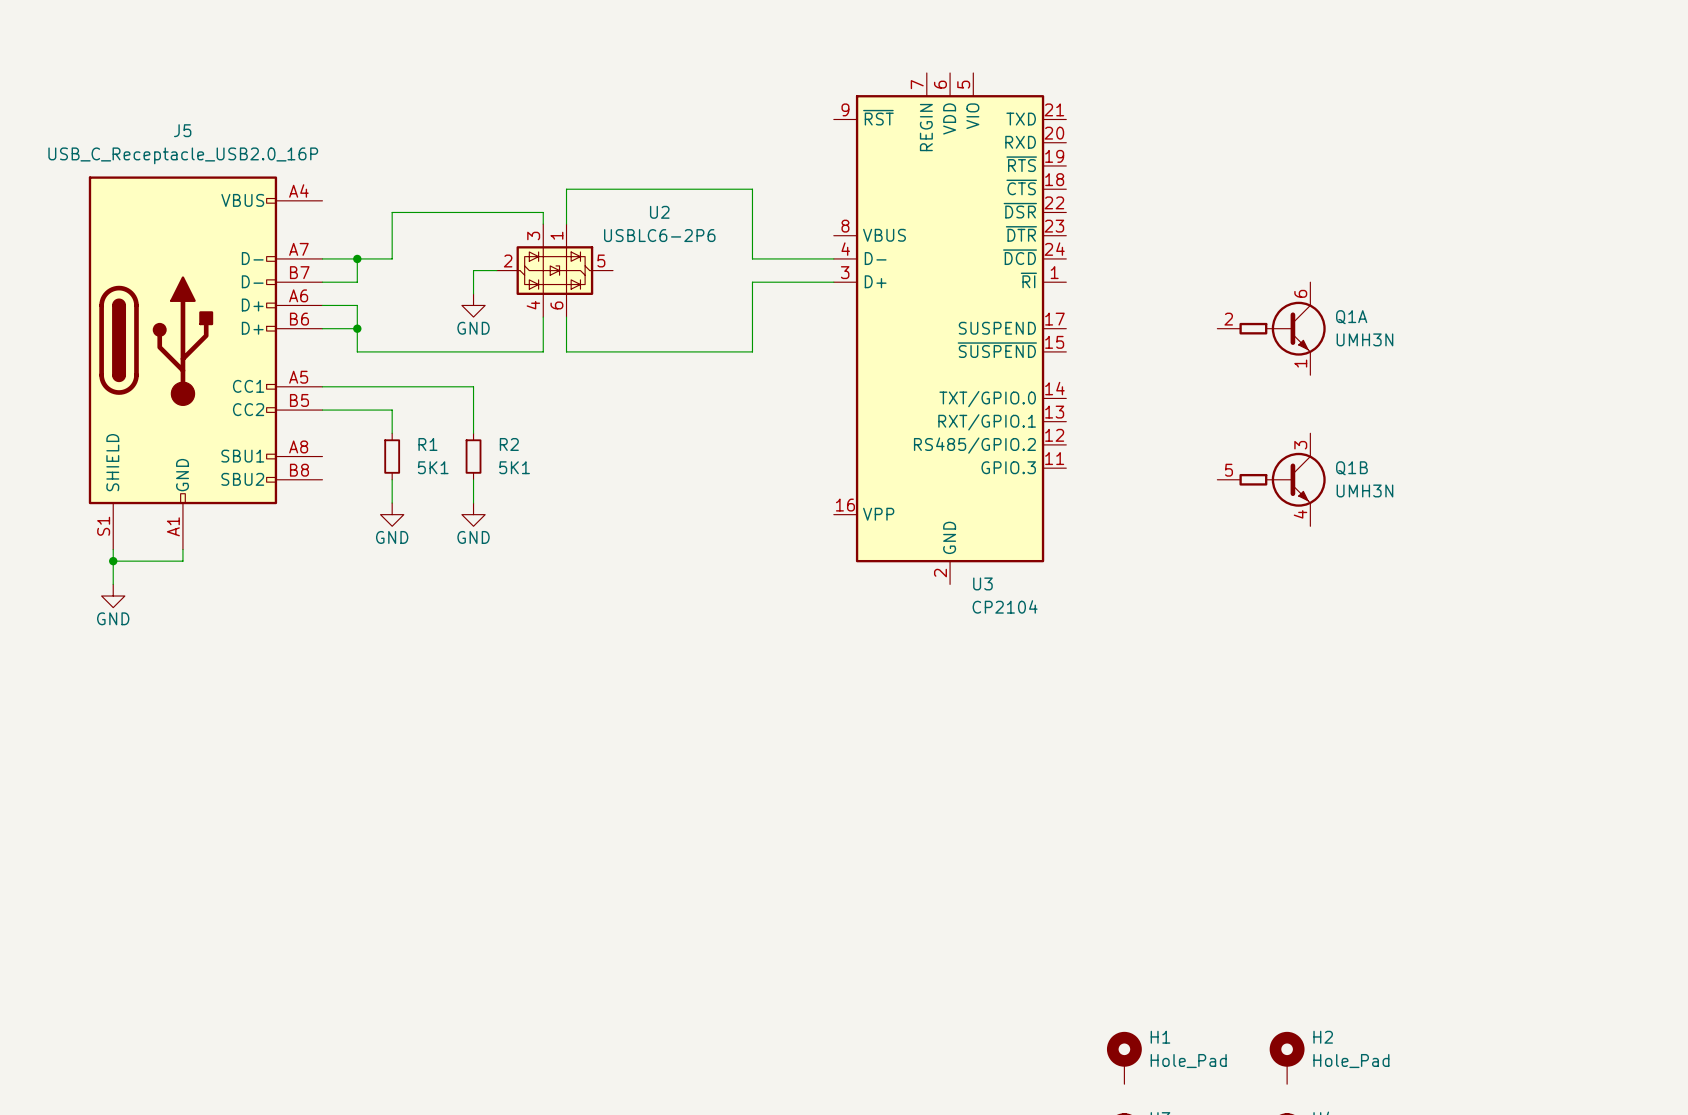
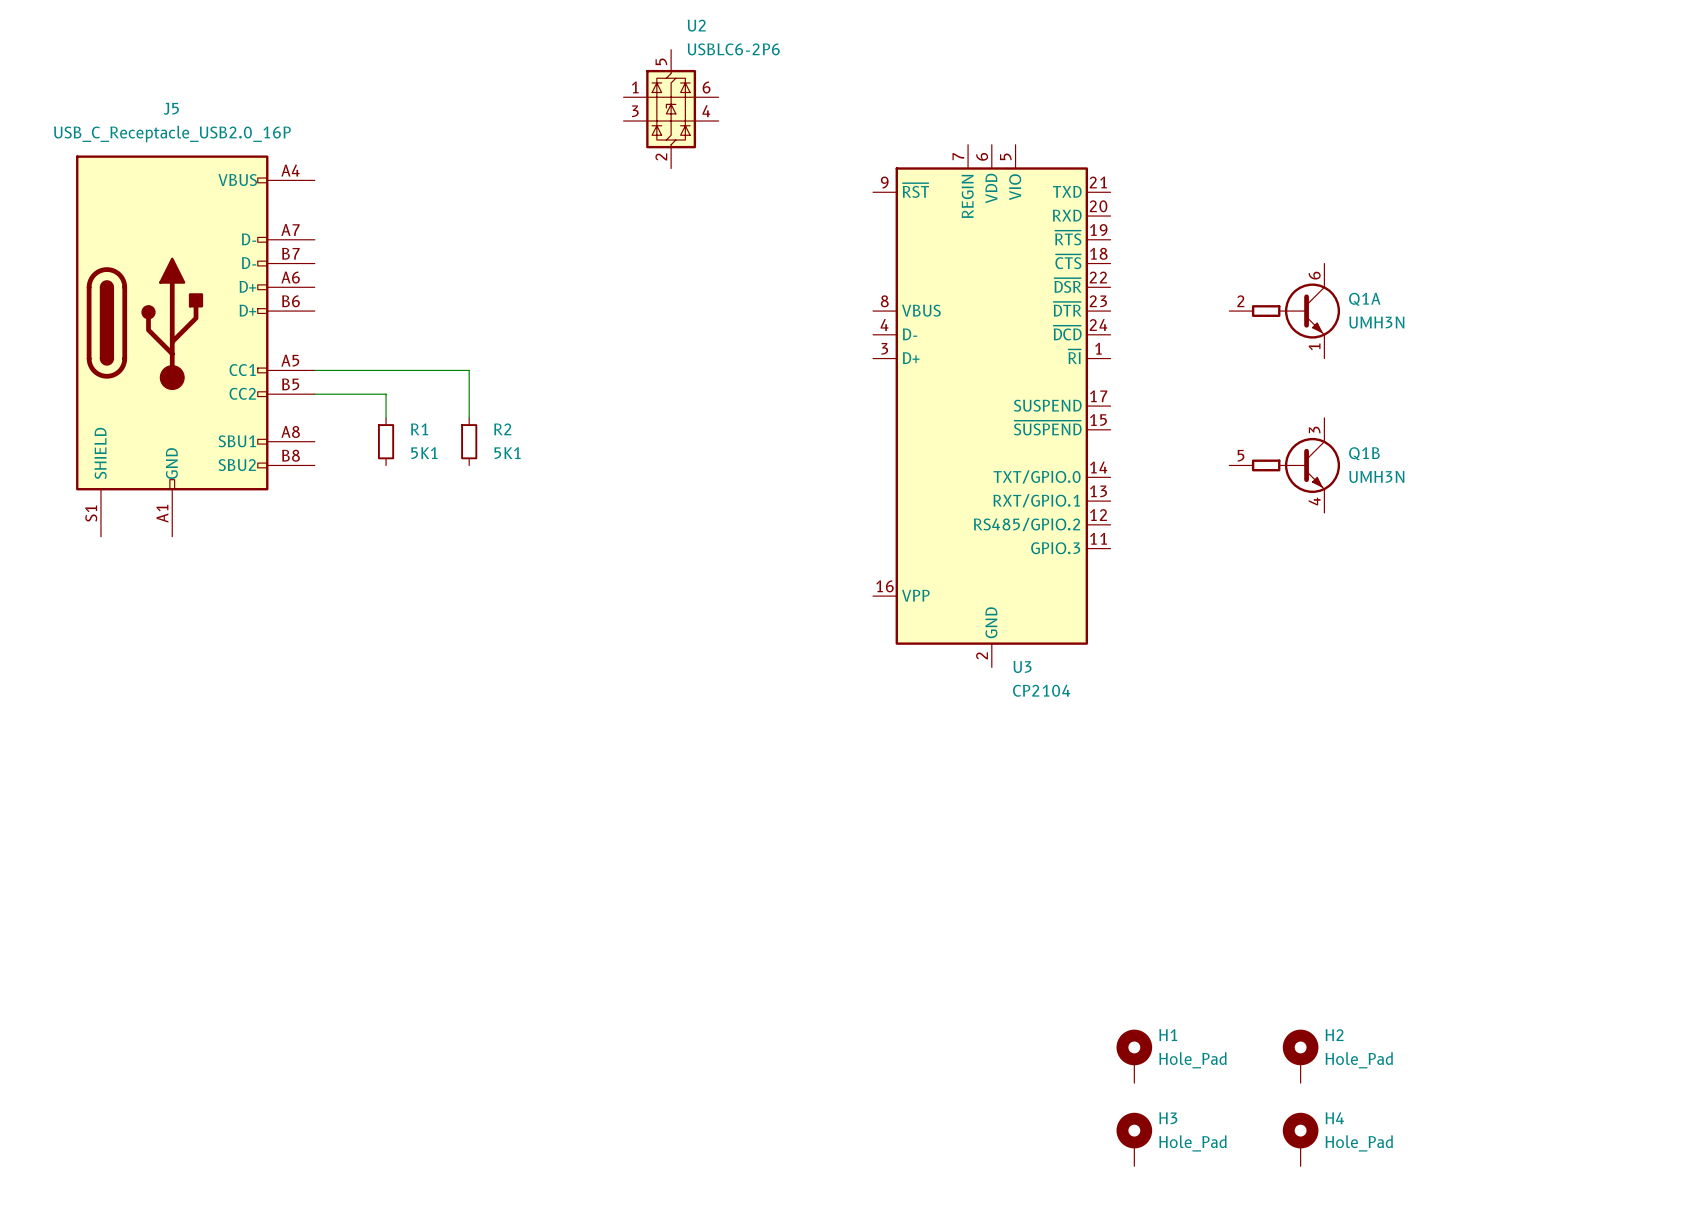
U2 name position: U2 (659, 212) -> U2 (696, 25)
wire: (543, 224) (543, 212) (392, 212) (392, 258) (322, 258) -> none
wire: (566, 224) (566, 189) (752, 189) (752, 258) (833, 258) -> none
U2 value position: USBLC6-2P6 (659, 235) -> USBLC6-2P6 (733, 49)
wire: (357, 258) (357, 282) (322, 282) -> none
junction: (357, 258) -> none
wire: (496, 270) (473, 270) (473, 293) -> none
U2 rotation: 0° (554, 270) -> 90° counterclockwise (671, 109)
U2 position: (554, 270) -> (671, 109)
wire: (833, 282) (752, 282) (752, 351) (566, 351) (566, 317) -> none
wire: (322, 305) (357, 305) (357, 351) (543, 351) (543, 317) -> none
power symbol: GND (473, 305) -> none
wire: (322, 328) (357, 328) -> none
junction: (357, 328) -> none
U3 position: (950, 328) -> (991, 406)
wire: (392, 479) (392, 503) -> none
wire: (473, 479) (473, 503) -> none
power symbol: GND (392, 514) -> none
power symbol: GND (473, 514) -> none
wire: (113, 549) (113, 584) -> none
wire: (182, 549) (182, 561) (113, 561) -> none
junction: (113, 561) -> none
power symbol: GND (113, 596) -> none

